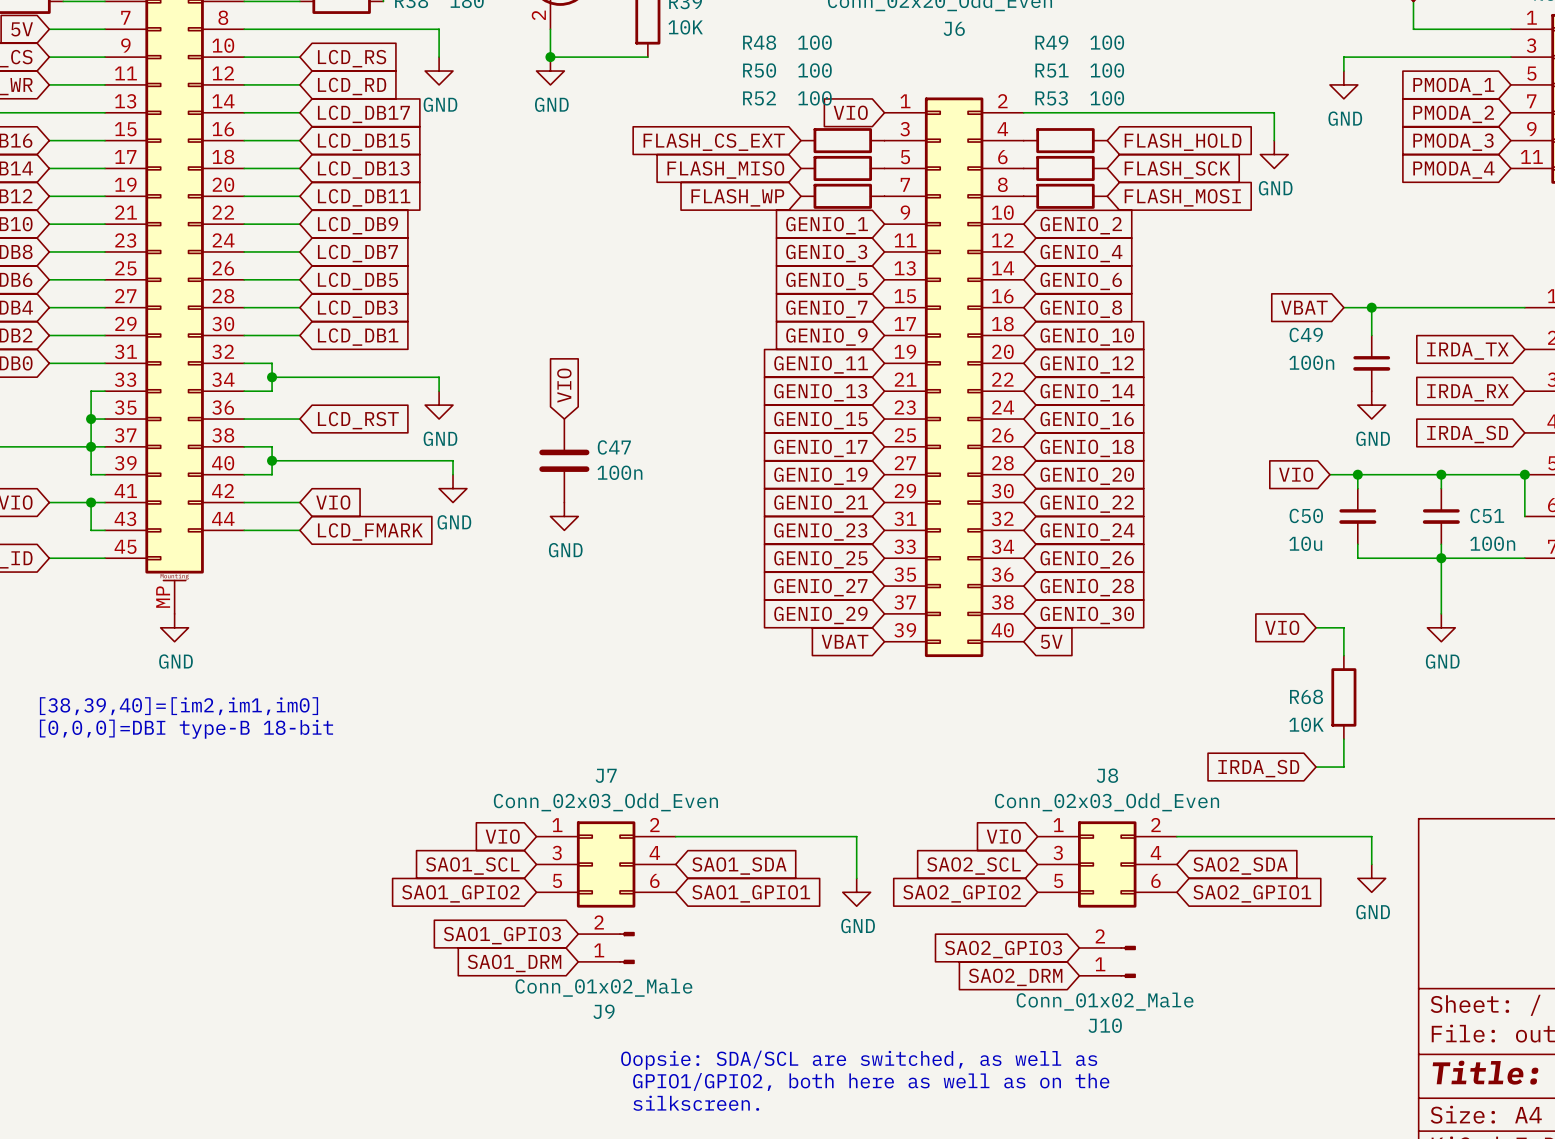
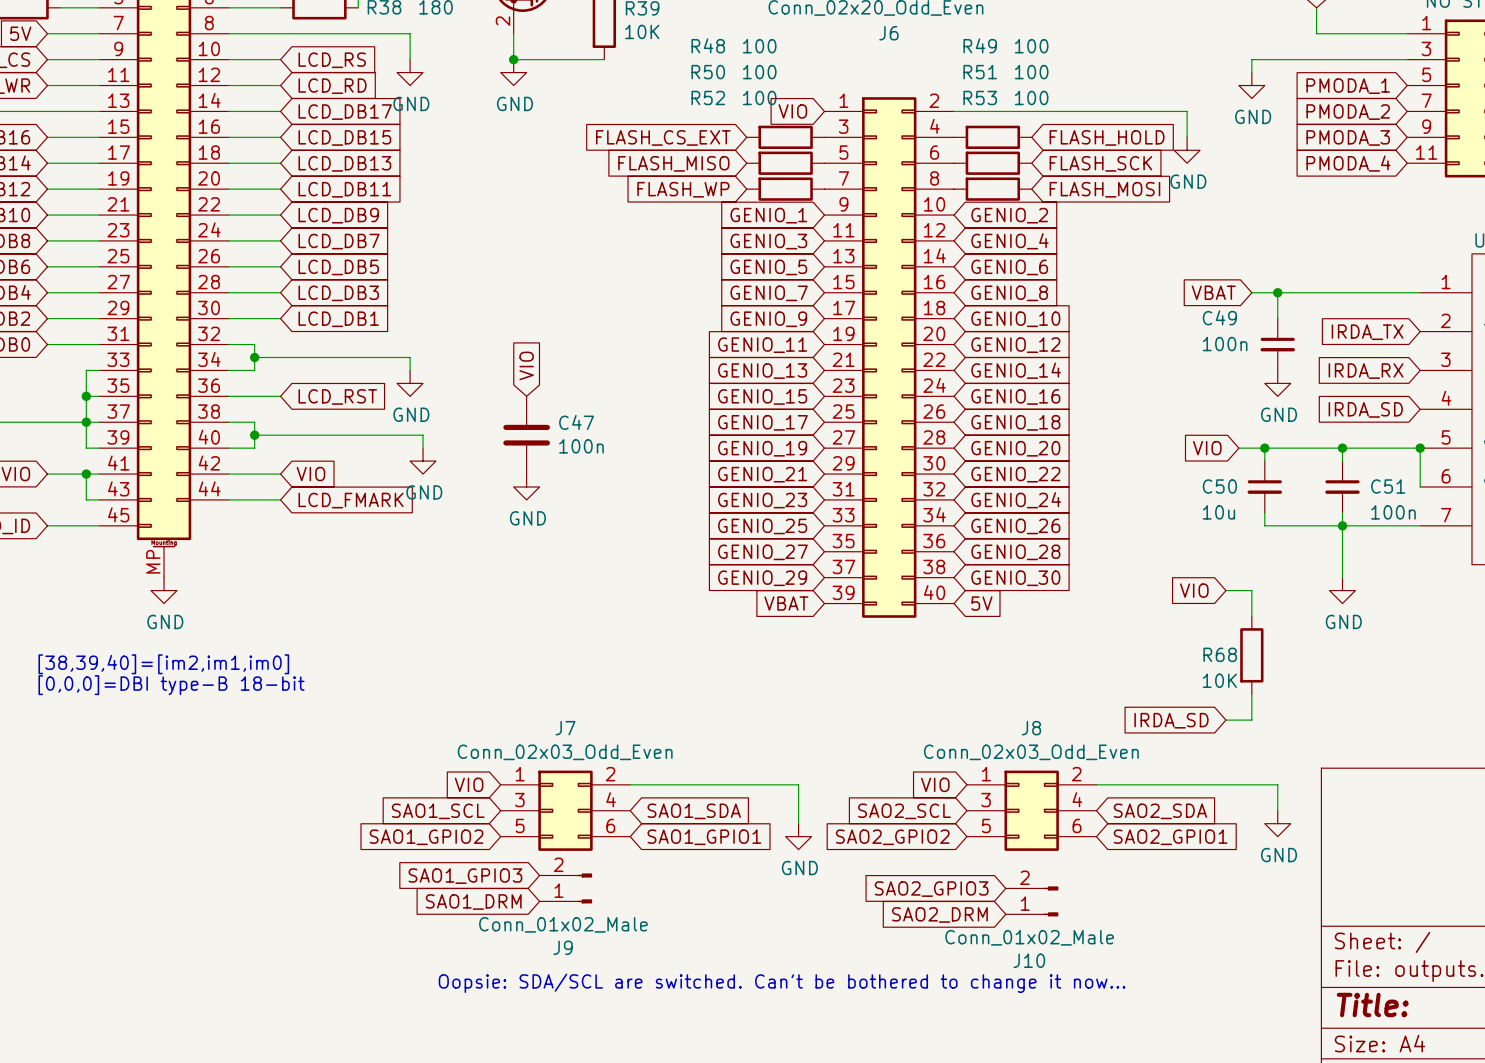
text: none -> Oopsie: SDA/SCL are switched. Can't be bothered to change it now... (782, 983)
text: Oopsie: SDA/SCL are switched, as well as (859, 1060) -> none
text: GPIO1/GPIO2, both here as well as on the (871, 1082) -> none
text: silkscreen. (696, 1103) -> none

